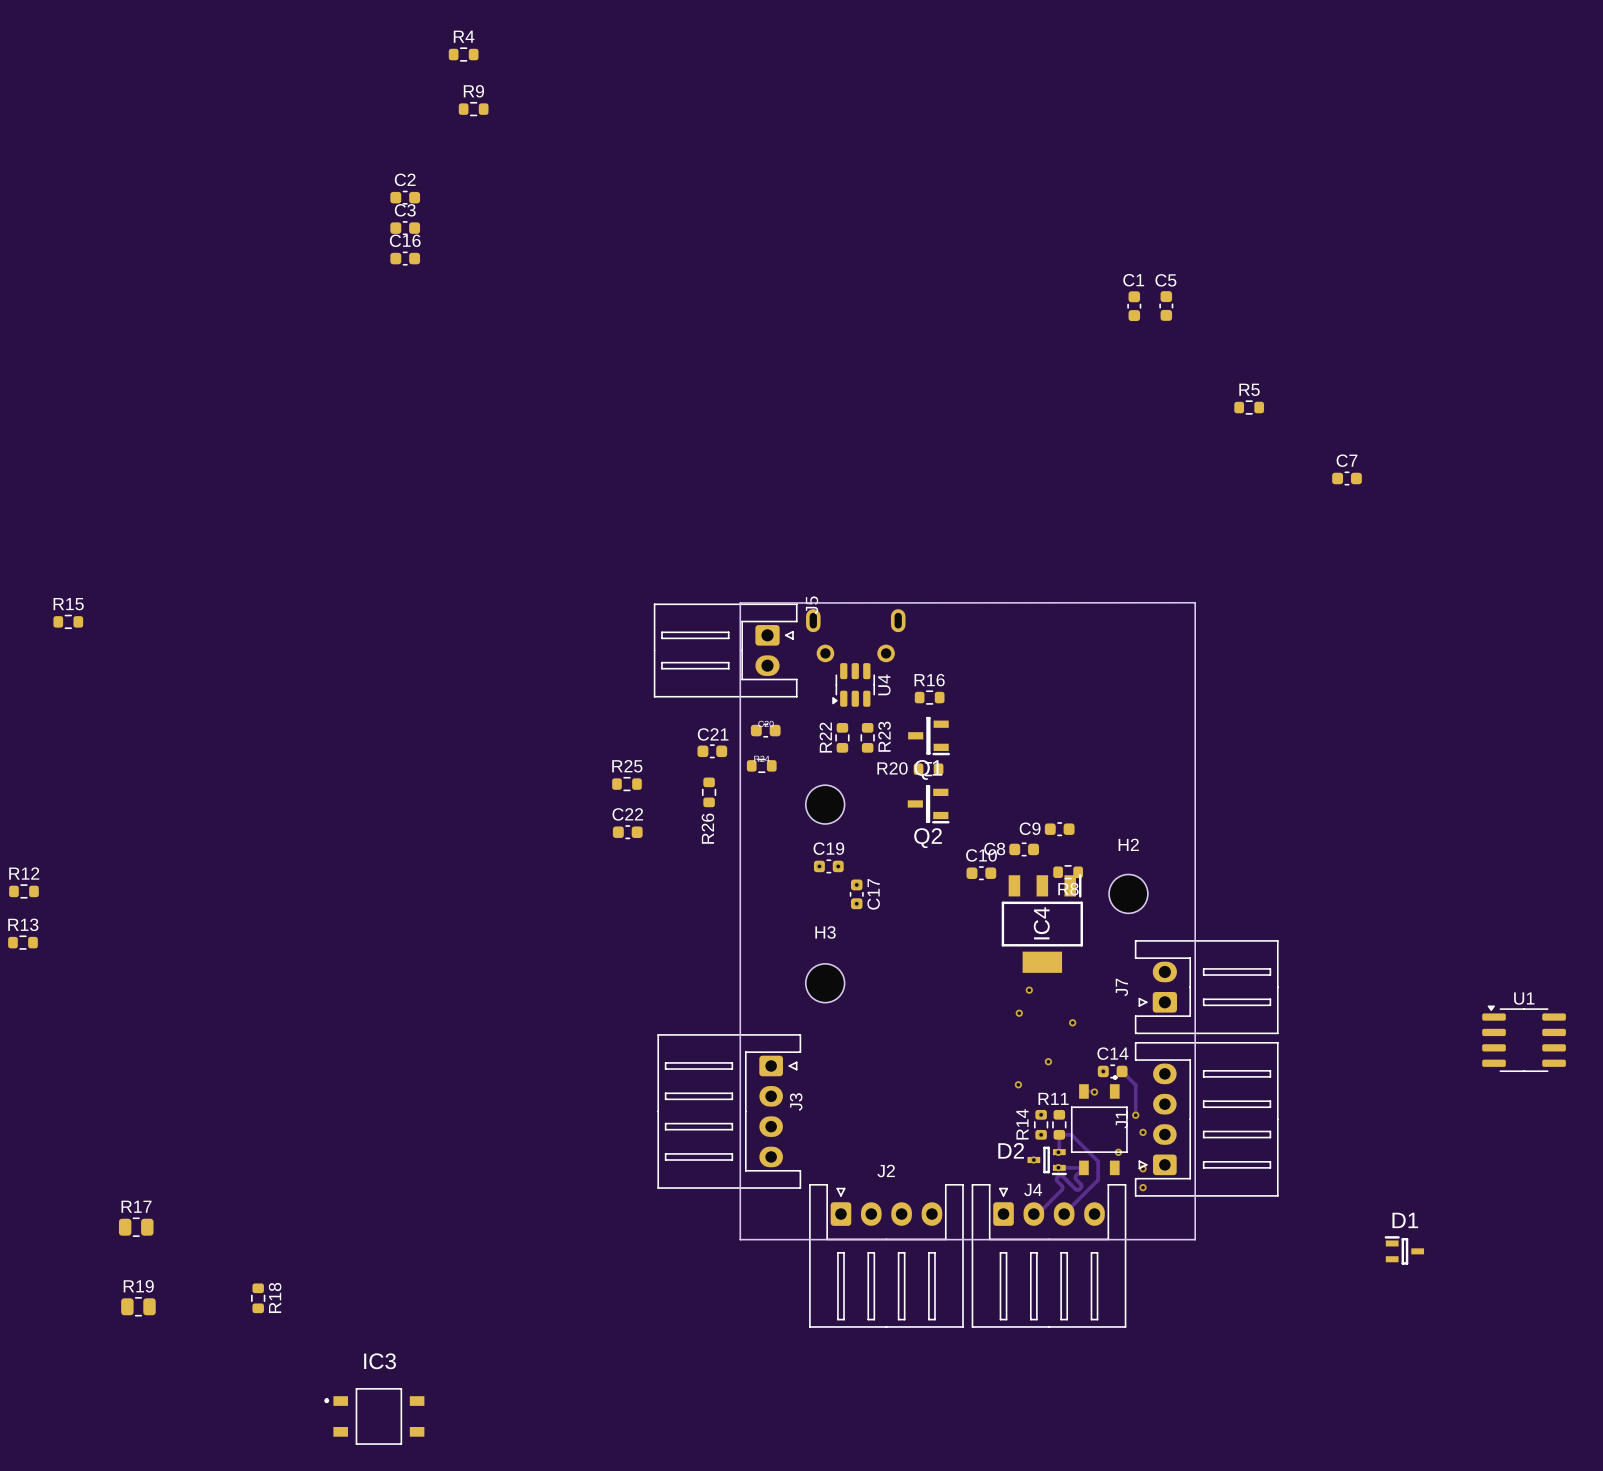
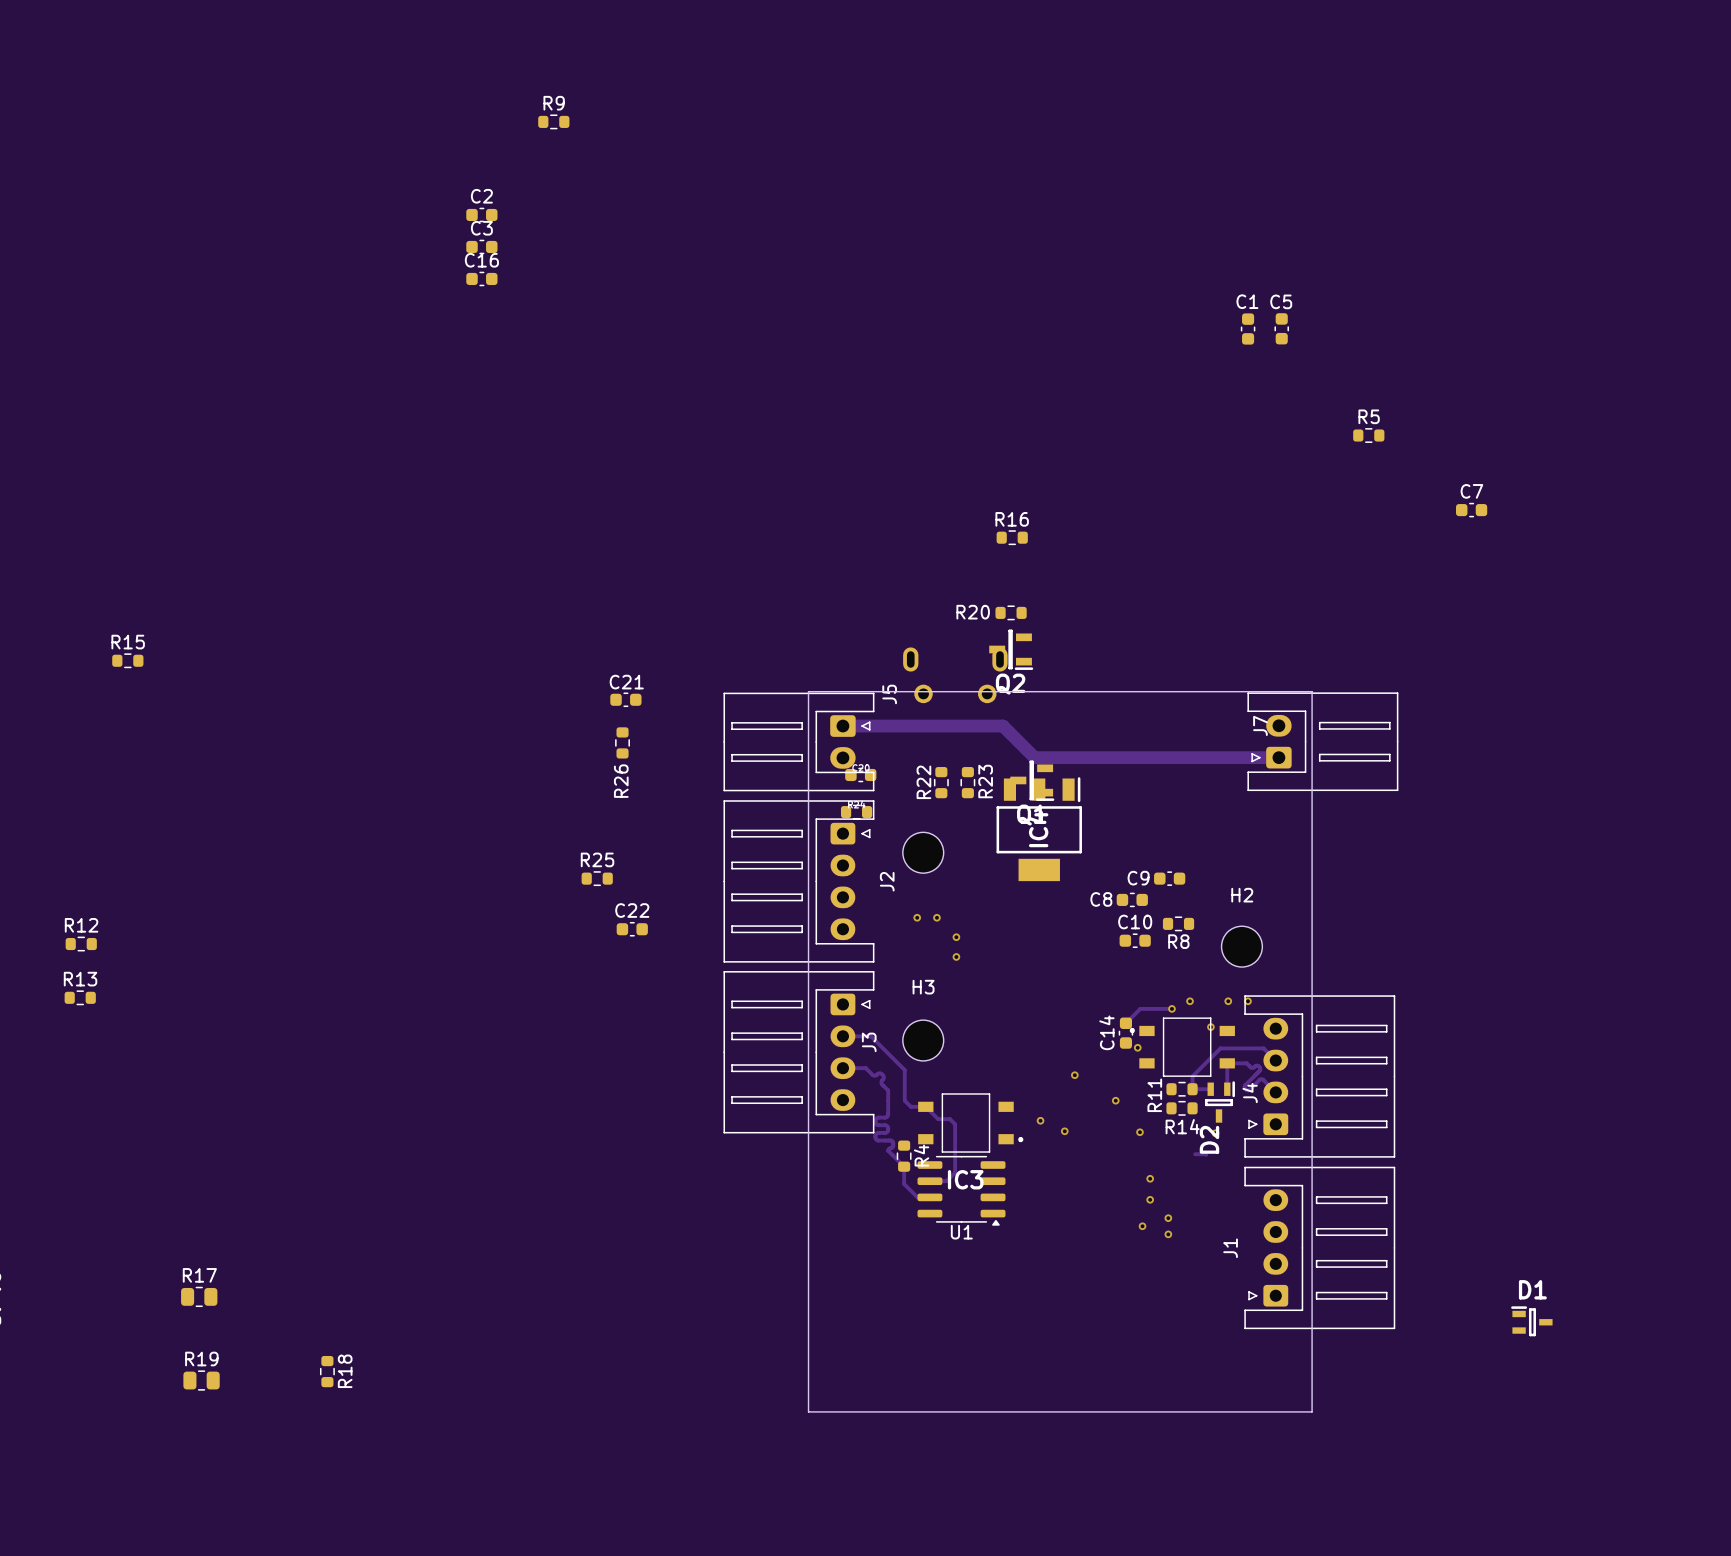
R4 rotation: 0° (463, 54) -> 90° clockwise (904, 1156)
R4 position: (463, 54) -> (904, 1156)
J5 position: (725, 650) -> (798, 741)
board edge: (1195, 651) (1195, 602) (740, 603) (740, 1239) (1195, 1239) -> (1312, 691) (808, 691) (808, 1411) (1312, 1411) (1312, 1309)
track: none -> (842, 726) (1003, 726) (1034, 757) (1278, 757)
U4: (853, 684) -> none
R16 position: (929, 697) -> (1012, 537)
C21 position: (712, 751) -> (625, 699)
R20 position: (928, 769) -> (1011, 612)
R25 position: (626, 784) -> (597, 878)
R26 position: (709, 792) -> (622, 742)
Q2 position: (928, 804) -> (1011, 649)
C22 position: (627, 832) -> (632, 929)
C19: (828, 866) -> none
C10 position: (981, 873) -> (1135, 940)
C17: (856, 894) -> none
IC4 position: (1042, 923) -> (1039, 829)
via: none -> (1190, 1001)
via: none -> (1228, 1001)
via: none -> (1248, 1001)
track: none -> (1171, 1008) (1140, 1008) (1125, 1023)
via: none -> (1171, 1008)
via: none -> (1210, 1027)
track: none -> (842, 1036) (870, 1036) (904, 1070) (904, 1100) (910, 1106) (925, 1106) (938, 1119) (950, 1119) (955, 1124) (955, 1172) (946, 1181) (929, 1181)
J7 name position: J7 (1121, 987) -> J7 (1260, 725)
J7 position: (1206, 987) -> (1322, 741)
track: none -> (1275, 1060) (1263, 1048) (1220, 1048) (1192, 1076) (1192, 1089) (1210, 1089)
track: none -> (842, 1068) (865, 1068) (873, 1075) (879, 1073) (883, 1075) (881, 1083) (888, 1090) (888, 1114) (885, 1117) (876, 1118) (875, 1122) (877, 1125) (886, 1125) (888, 1130) (885, 1132) (876, 1133) (875, 1138) (878, 1140) (892, 1141) (893, 1146) (888, 1150) (904, 1166) (904, 1184) (917, 1197) (929, 1197)
via: (1019, 1013) -> none
via: none -> (1074, 1075)
via: (1072, 1022) -> none
track: none -> (1227, 1089) (1227, 1063) (1246, 1063) (1251, 1067) (1257, 1065) (1260, 1069) (1245, 1085) (1245, 1088) (1249, 1090) (1261, 1079) (1275, 1092)
U1 rotation: 0° (1524, 1038) -> 180° (961, 1190)
U1 position: (1524, 1038) -> (961, 1190)
via: none -> (1115, 1100)
C14 name position: C14 (1112, 1053) -> C14 (1106, 1032)
via: none -> (1040, 1120)
via: (1048, 1061) -> none
via: none -> (1064, 1131)
via: none -> (1139, 1132)
C14 rotation: 0° (1112, 1071) -> 90° clockwise (1125, 1033)
C14 position: (1112, 1071) -> (1125, 1033)
track: (1122, 1071) (1135, 1085) (1135, 1115) -> none
via: (1018, 1084) -> none
via: (1094, 1092) -> none
R11 name position: R11 (1053, 1098) -> R11 (1154, 1095)
J3 position: (729, 1111) -> (798, 1052)
via: (1135, 1115) -> none
J1 position: (1206, 1119) -> (1319, 1247)
R14 name position: R14 (1022, 1124) -> R14 (1182, 1126)
R14 rotation: 0° (1041, 1124) -> 90° clockwise (1182, 1108)
R14 position: (1041, 1124) -> (1182, 1108)
R11 rotation: 0° (1059, 1124) -> 90° clockwise (1182, 1089)
R11 position: (1059, 1124) -> (1182, 1089)
part rotation: 0° (1099, 1125) -> 90° counterclockwise (1182, 1047)
part position: (1099, 1125) -> (1182, 1047)
via: (1143, 1132) -> none
track: (1059, 1152) (1059, 1134) (1071, 1134) (1098, 1161) (1098, 1180) (1064, 1214) -> none
via: (1118, 1152) -> none
D2 rotation: 0° (1047, 1160) -> 90° counterclockwise (1219, 1101)
D2 position: (1047, 1160) -> (1219, 1101)
track: (1059, 1167) (1083, 1167) (1075, 1177) (1081, 1187) (1076, 1189) (1062, 1176) (1059, 1175) (1056, 1180) (1062, 1186) (1062, 1189) (1037, 1214) (1033, 1214) -> none
via: (1143, 1168) -> none
via: (1143, 1187) -> none
J2 rotation: 0° (886, 1255) -> 90° clockwise (798, 881)
J2 position: (886, 1255) -> (798, 881)
J4 rotation: 0° (1049, 1255) -> 90° counterclockwise (1319, 1076)
J4 position: (1049, 1255) -> (1319, 1076)
IC3 rotation: 0° (374, 1416) -> 180° (970, 1123)
IC3 position: (374, 1416) -> (970, 1123)

